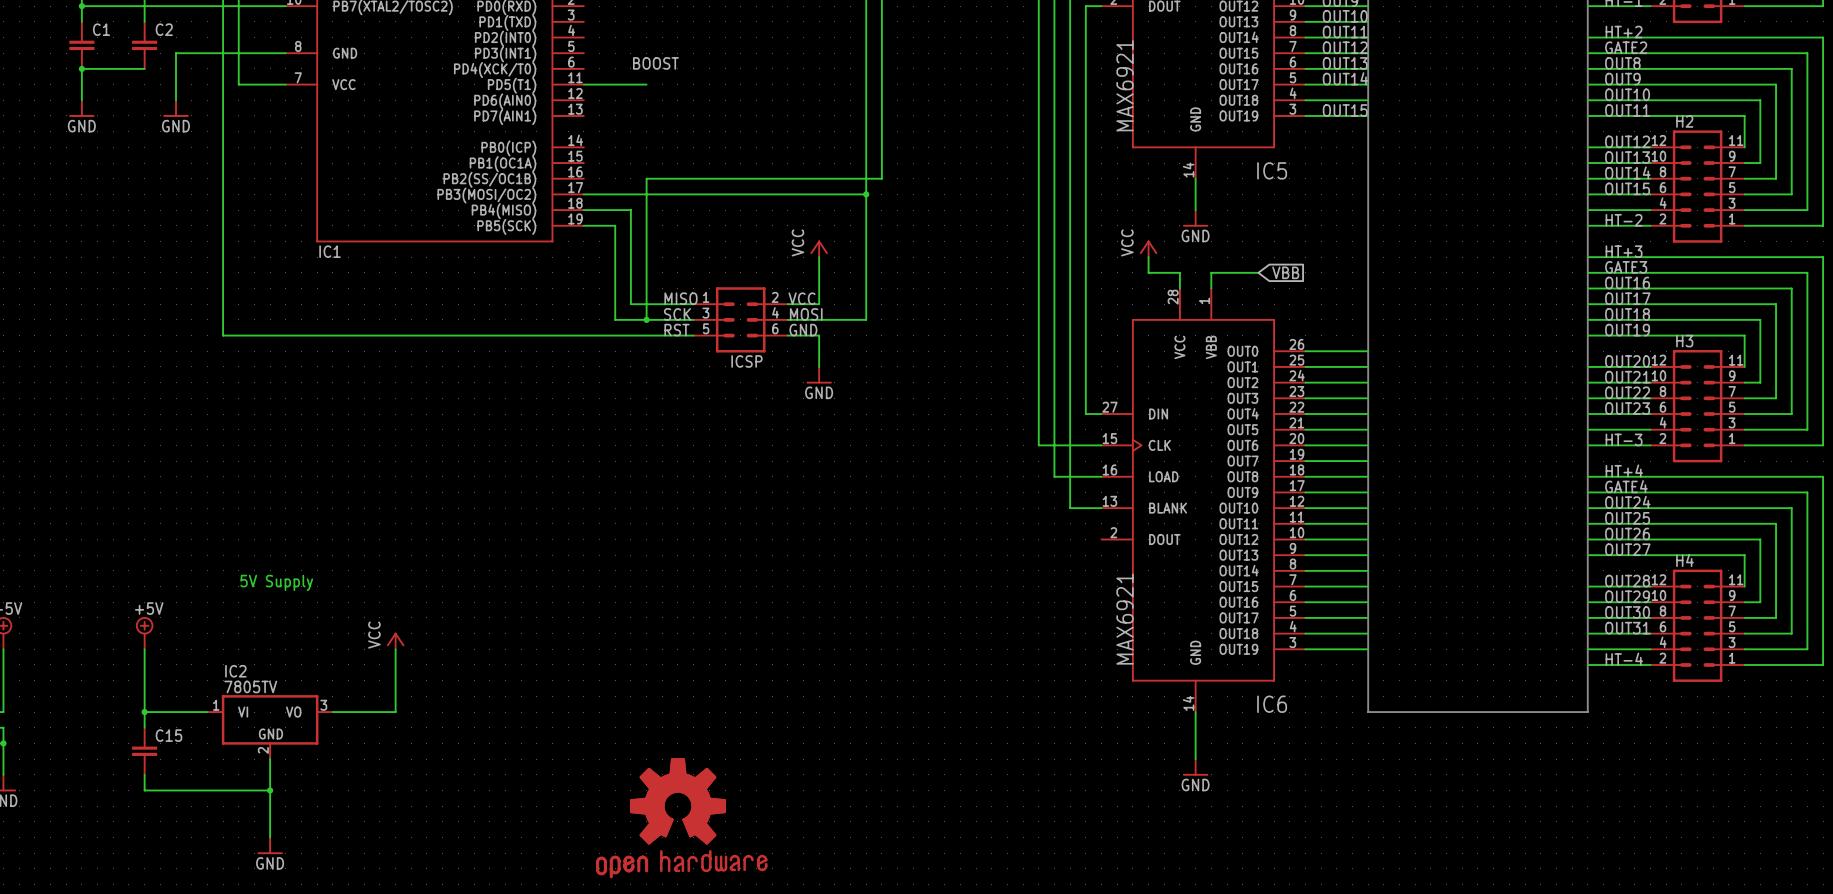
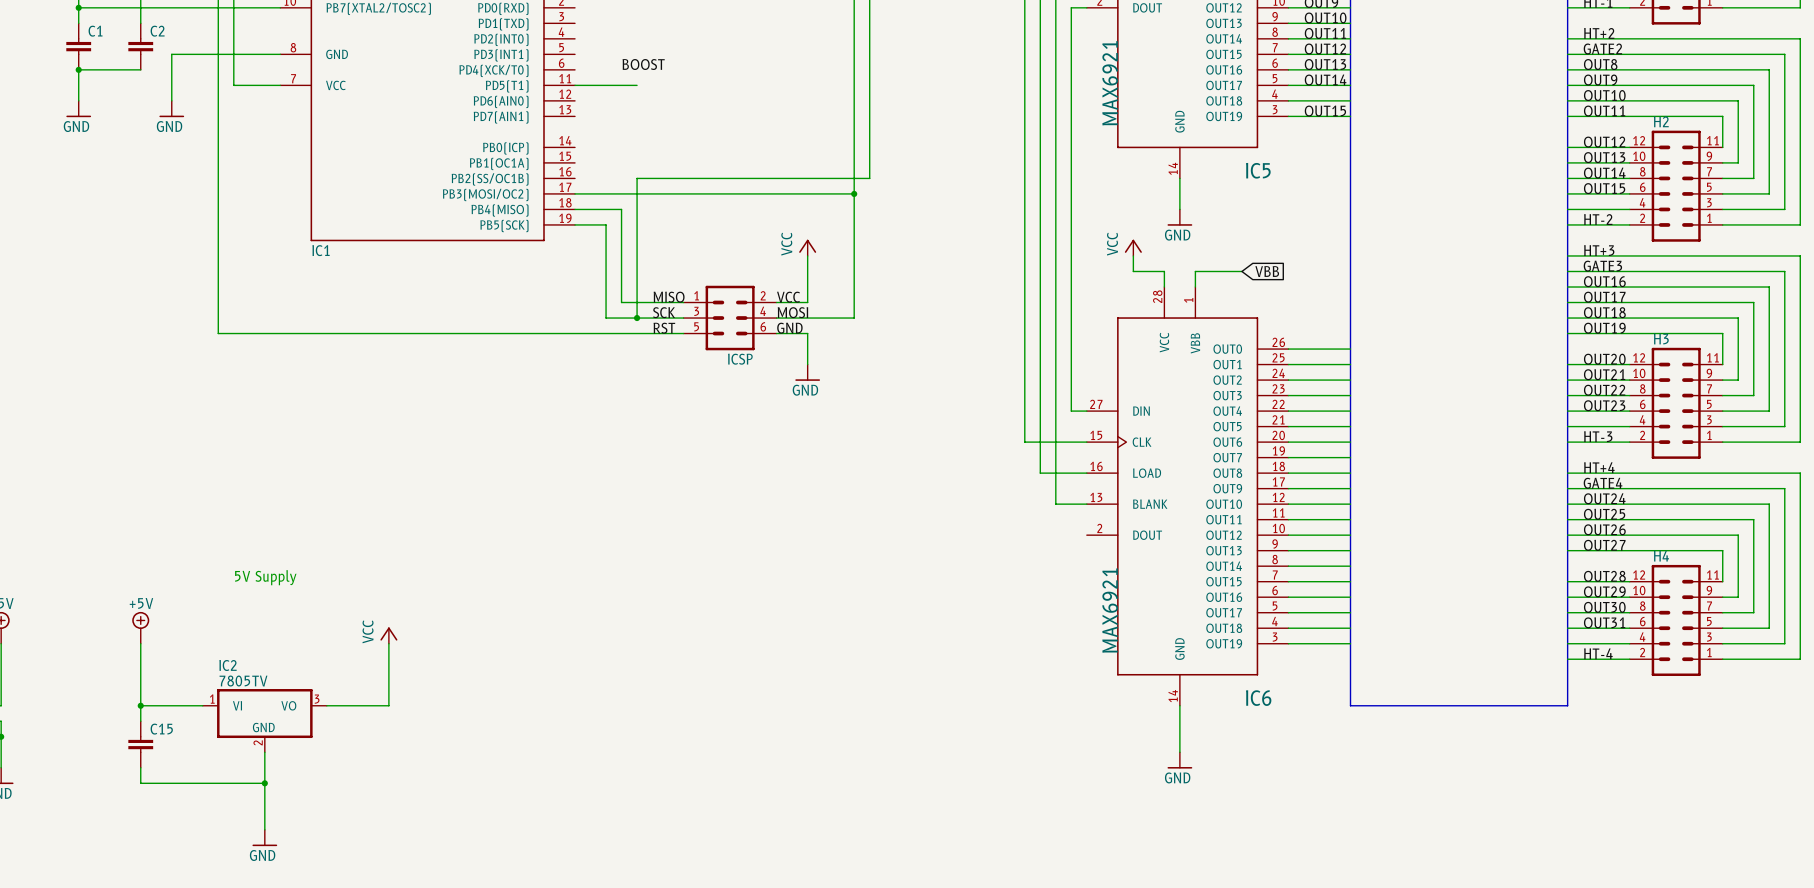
part: (681, 818) -> none

